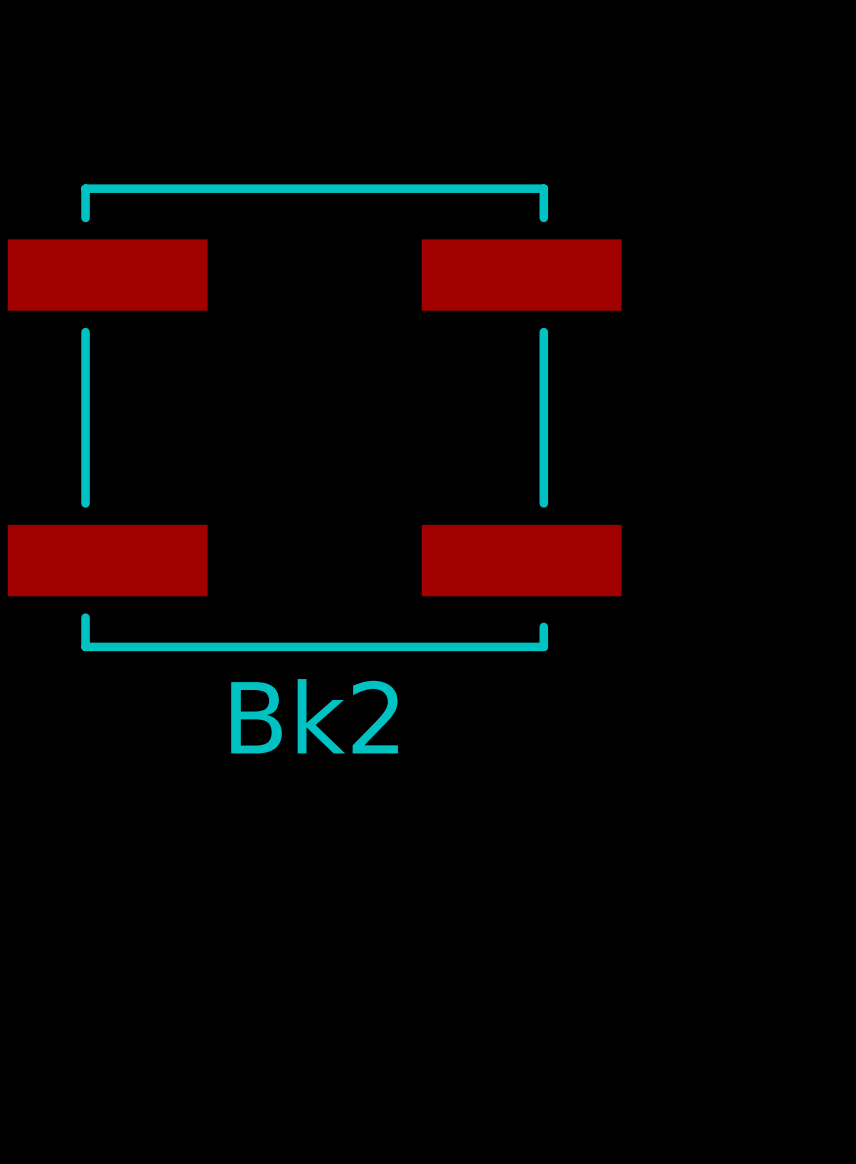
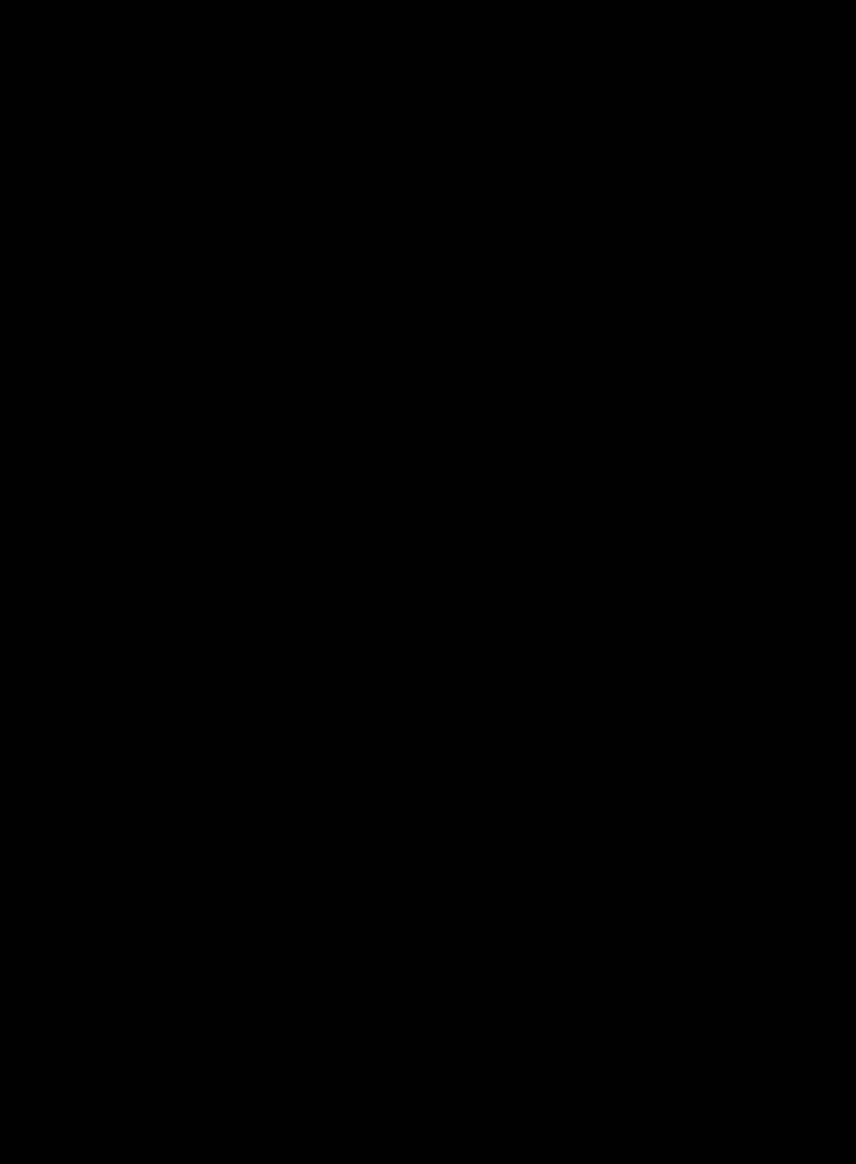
Bk2: (314, 417) -> none

